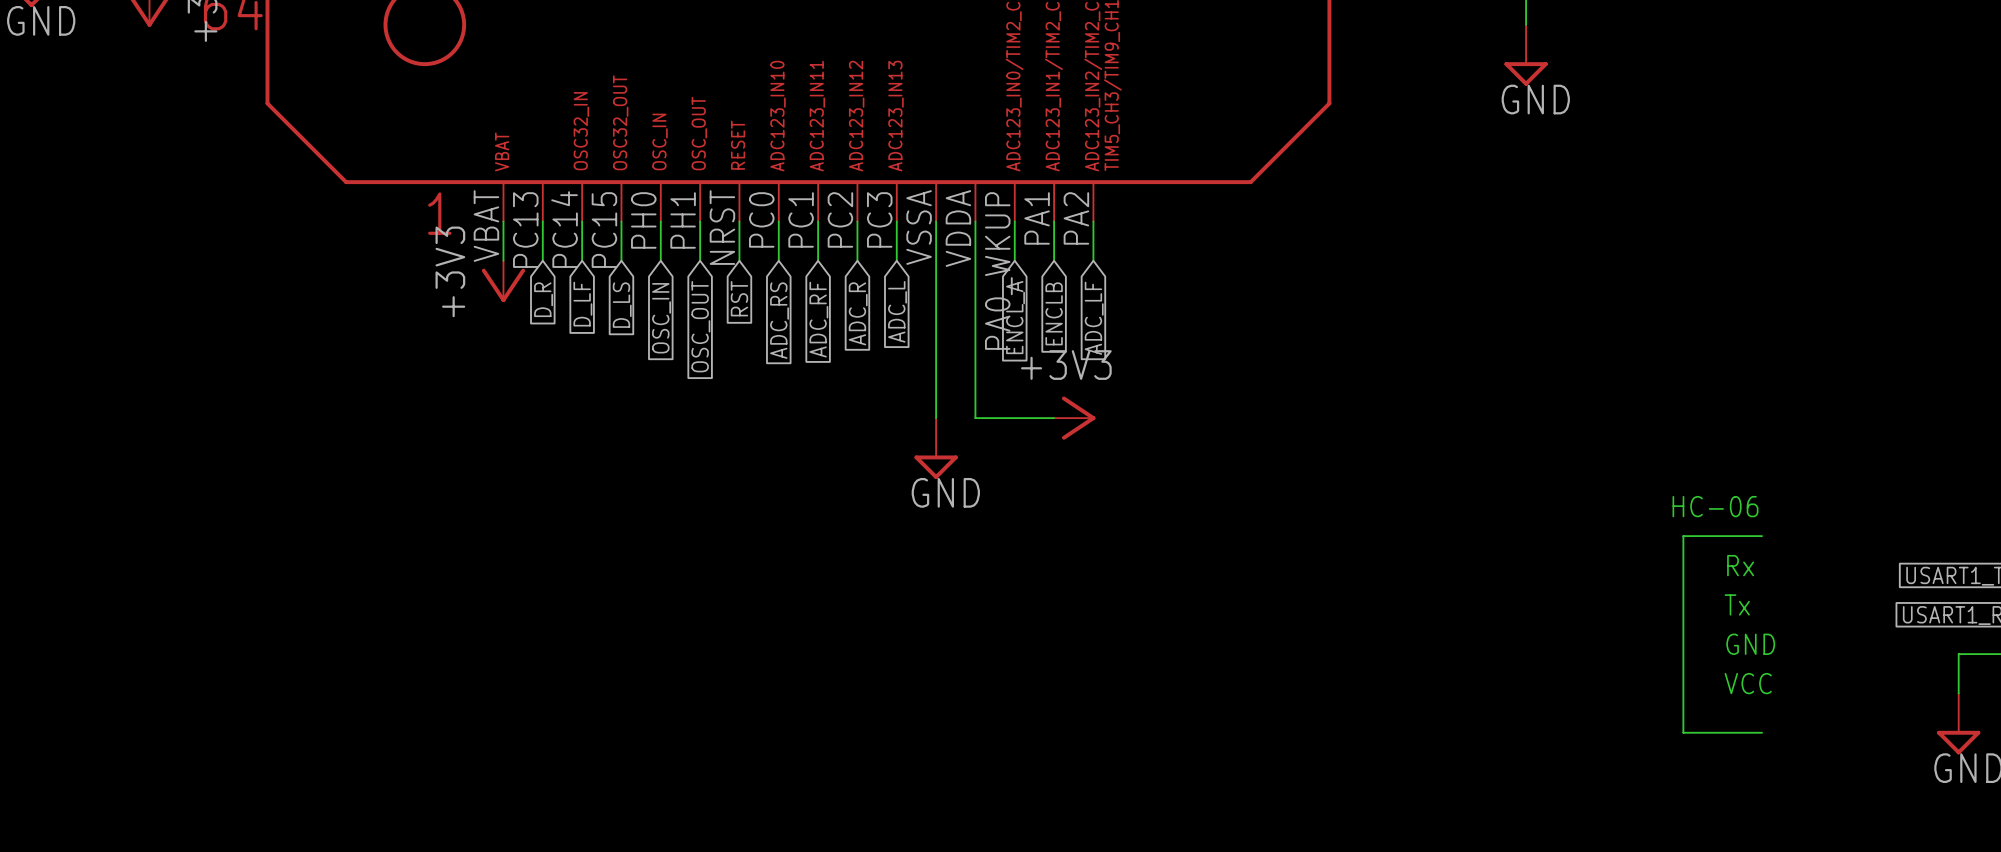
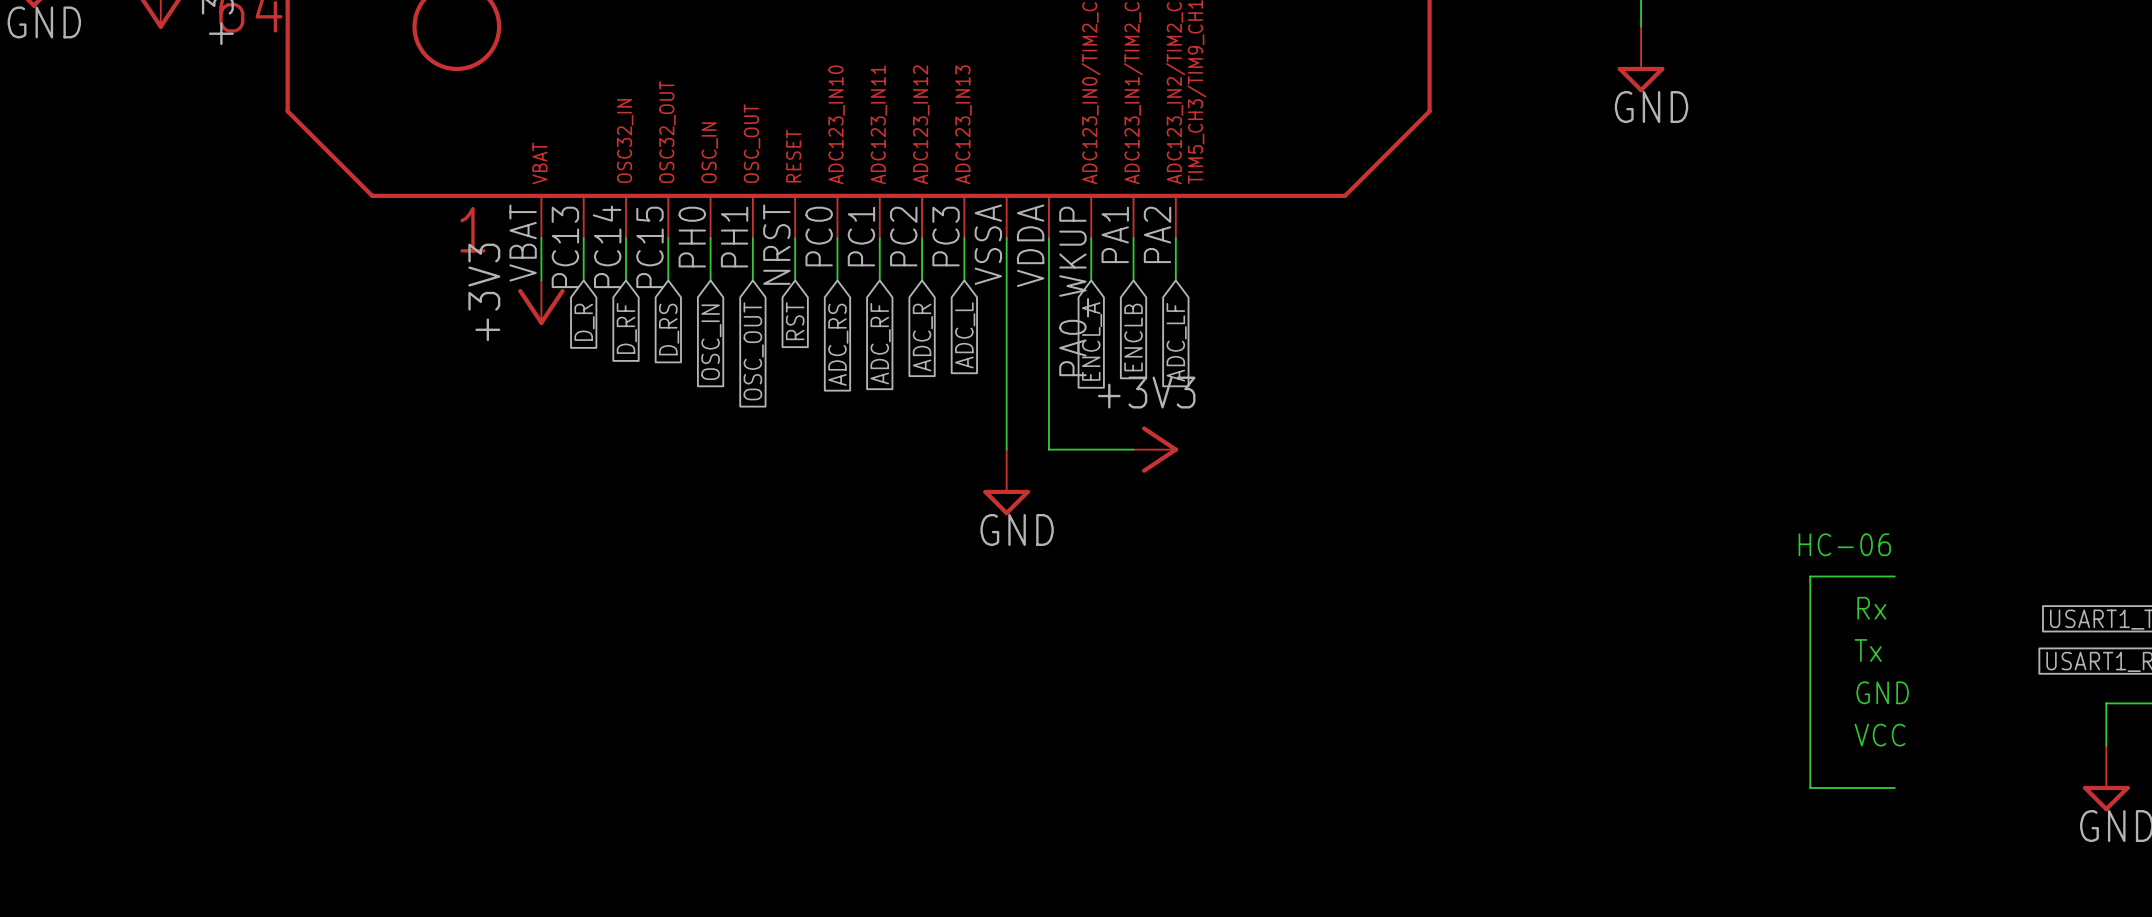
global label: D_LF (582, 304) -> D_RF (626, 328)
global label: D_LS (622, 305) -> D_RS (669, 329)

